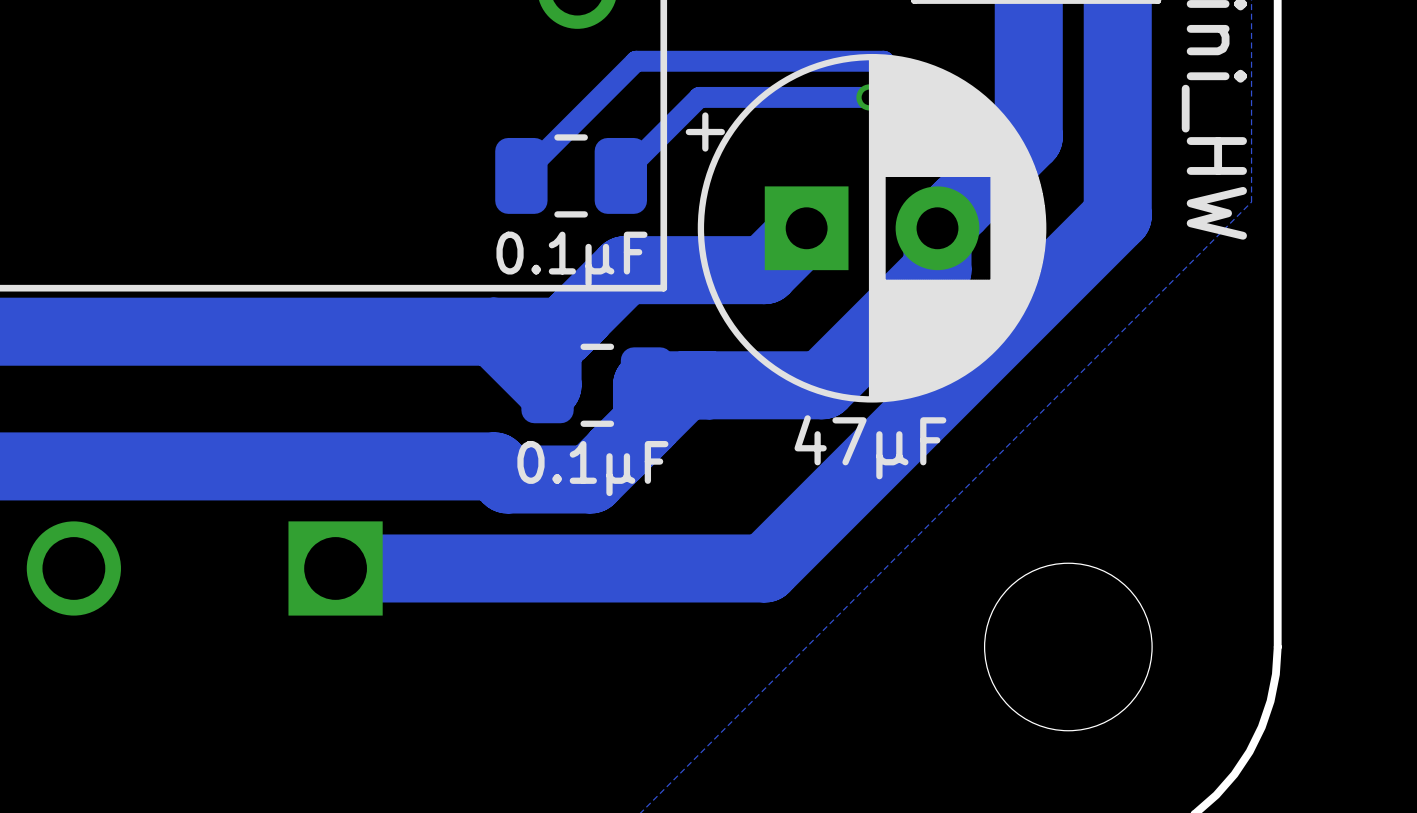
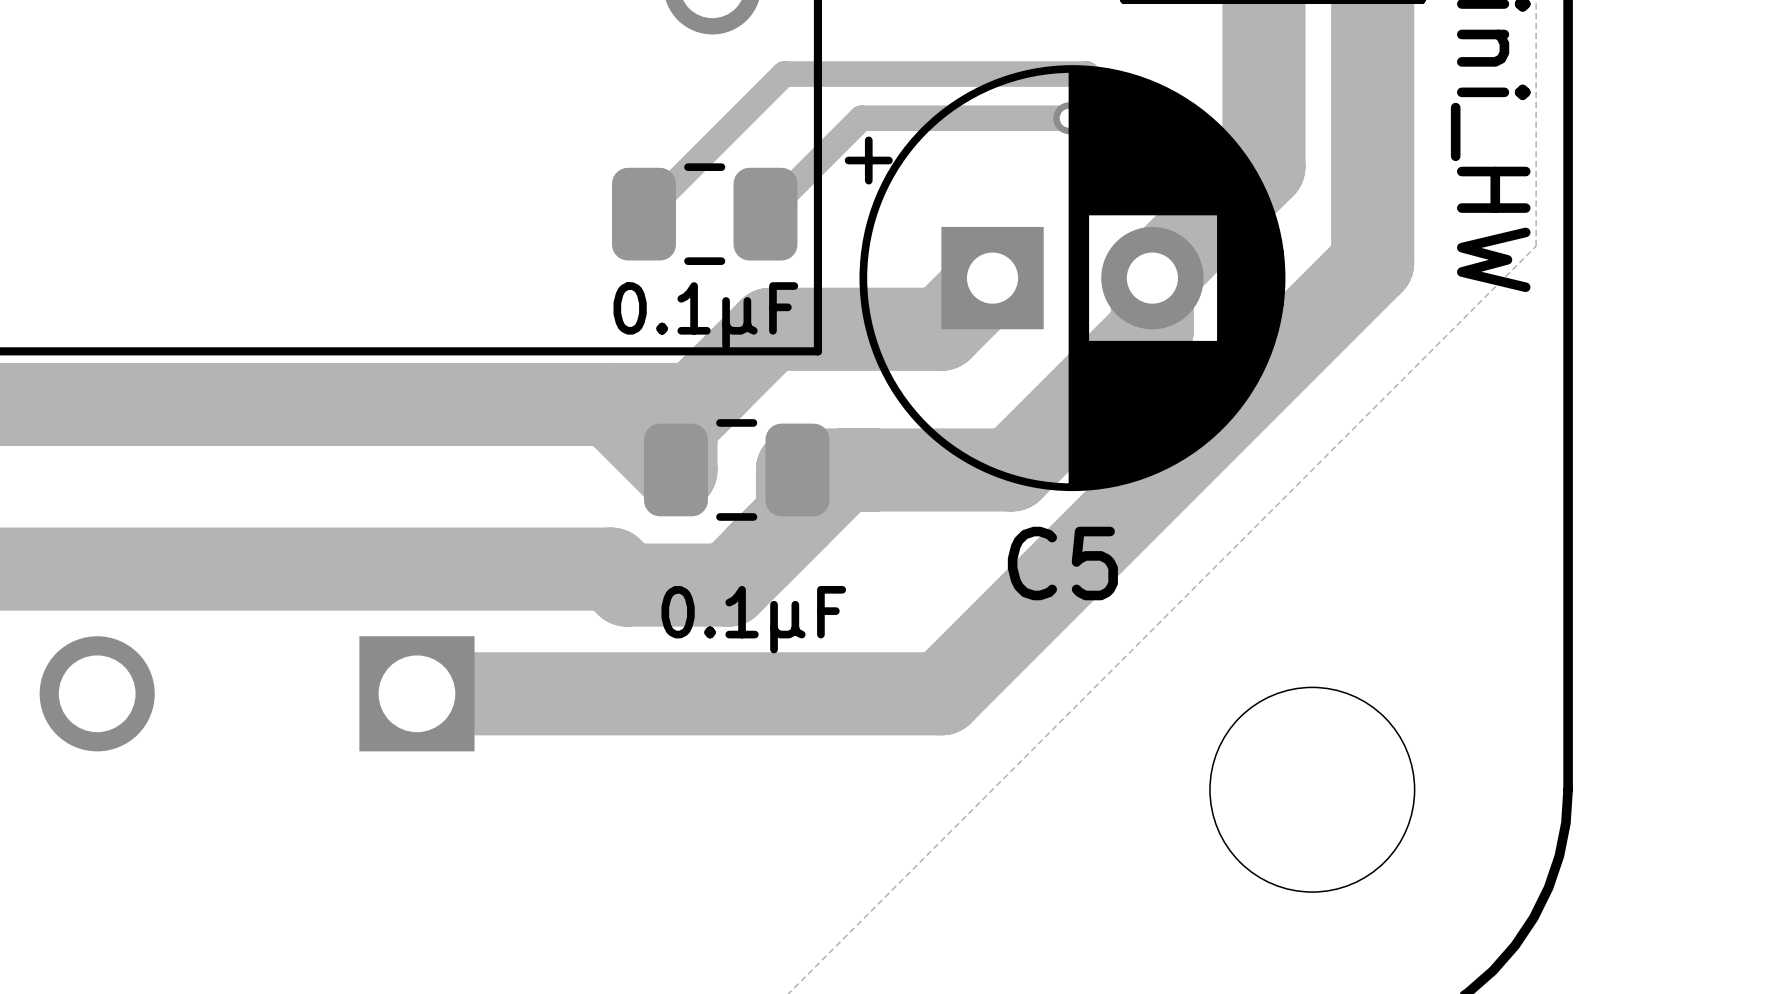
text: 47μF (870, 447) -> none
C5 name: none -> C5 (1062, 563)
text position: 0.1μF (592, 468) -> 0.1μF (753, 619)

